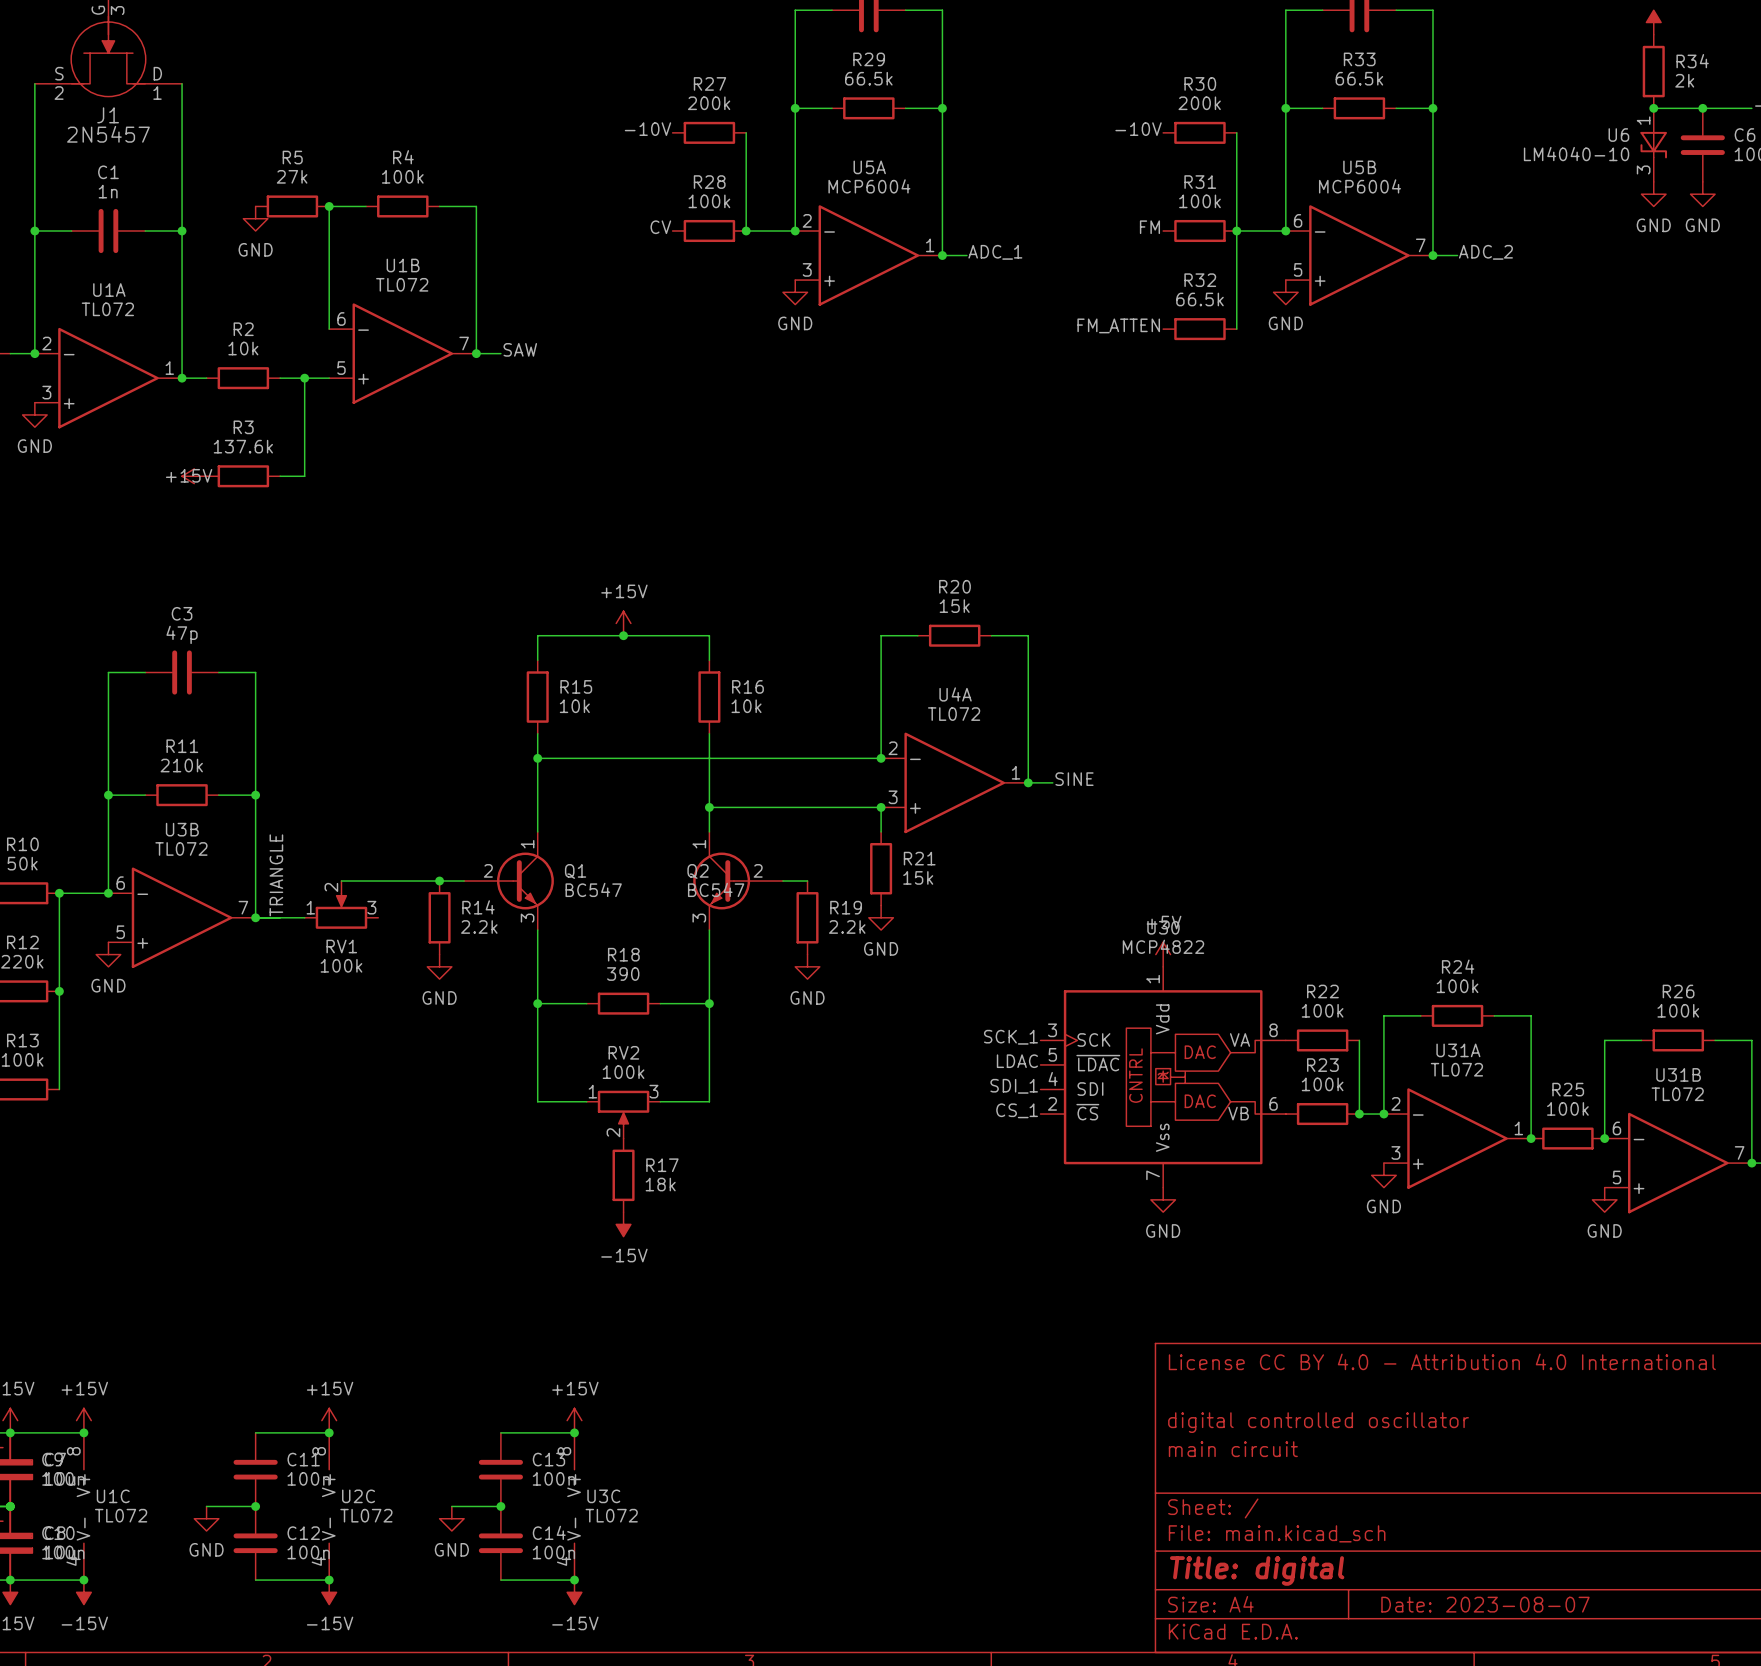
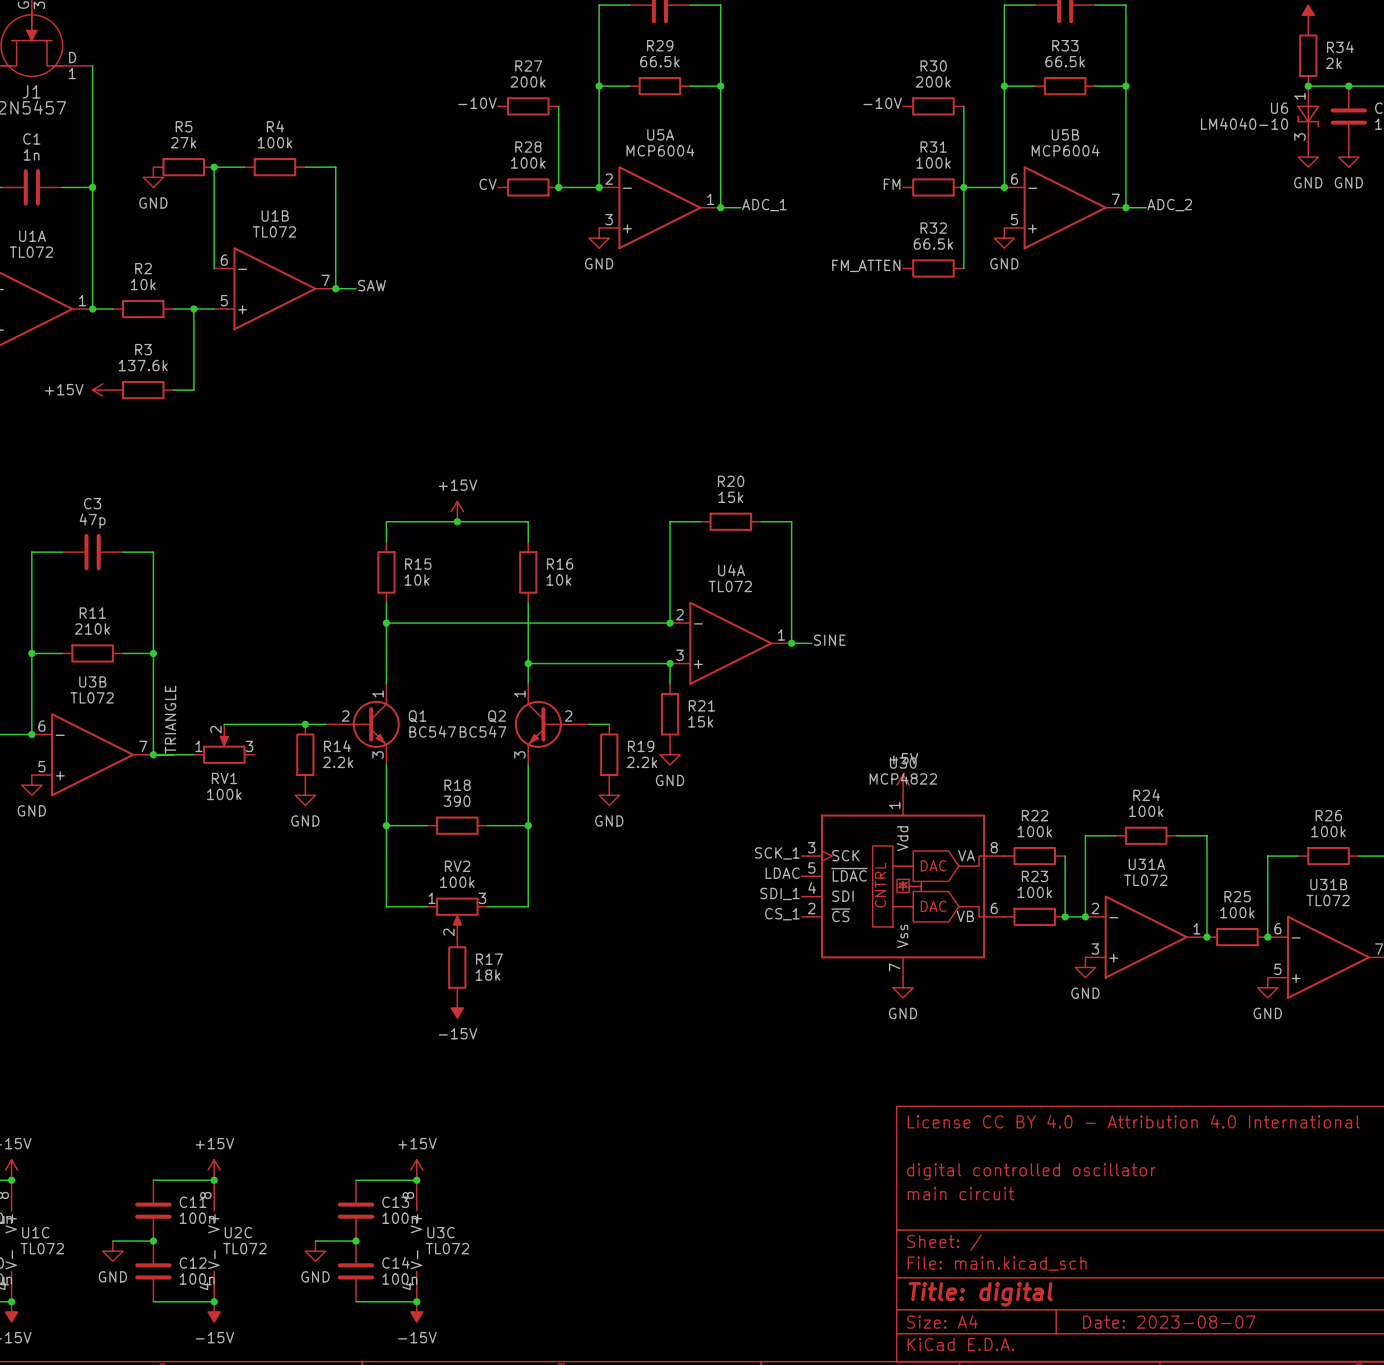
power symbol text position: +15V (189, 475) -> +15V (64, 389)
Q2 name position: Q2 (698, 871) -> Q2 (496, 716)
Q2 value position: BC547 (716, 889) -> BC547 (482, 731)

